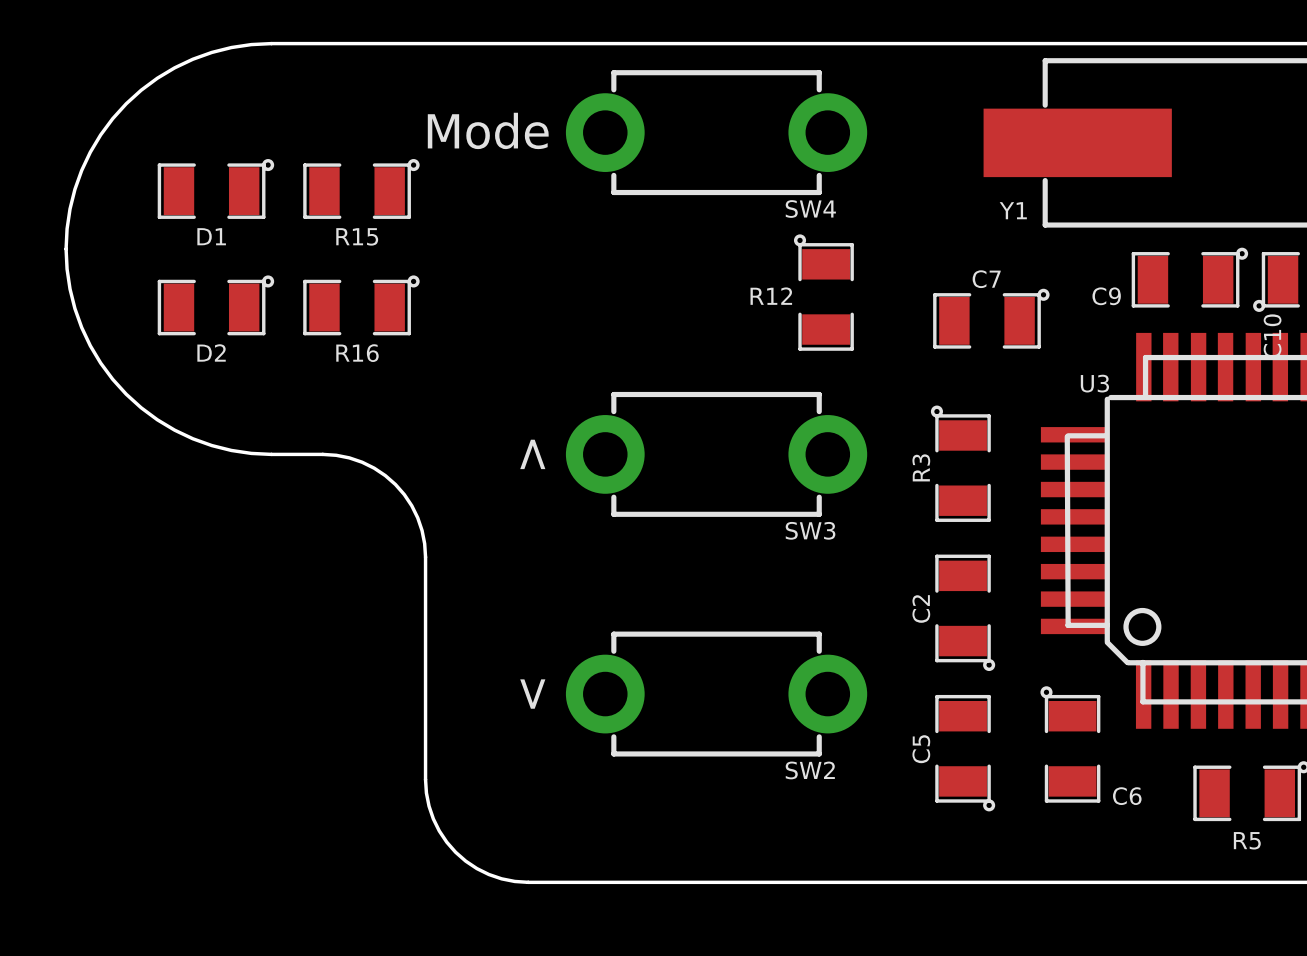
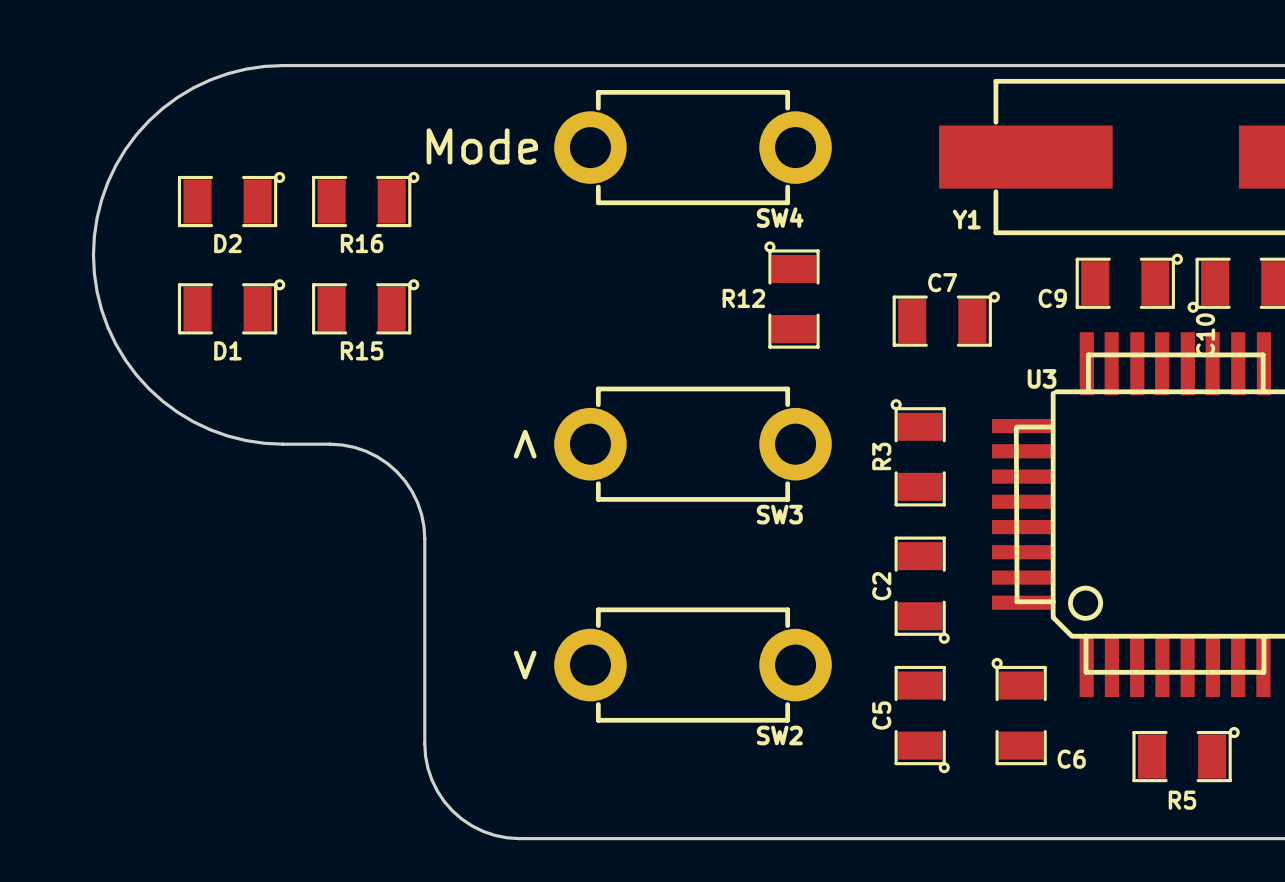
D1 name: D1 (211, 236) -> D2 (227, 243)
R15 name: R15 (357, 236) -> R16 (362, 243)
D2 name: D2 (211, 352) -> D1 (227, 350)
R16 name: R16 (357, 353) -> R15 (362, 350)

